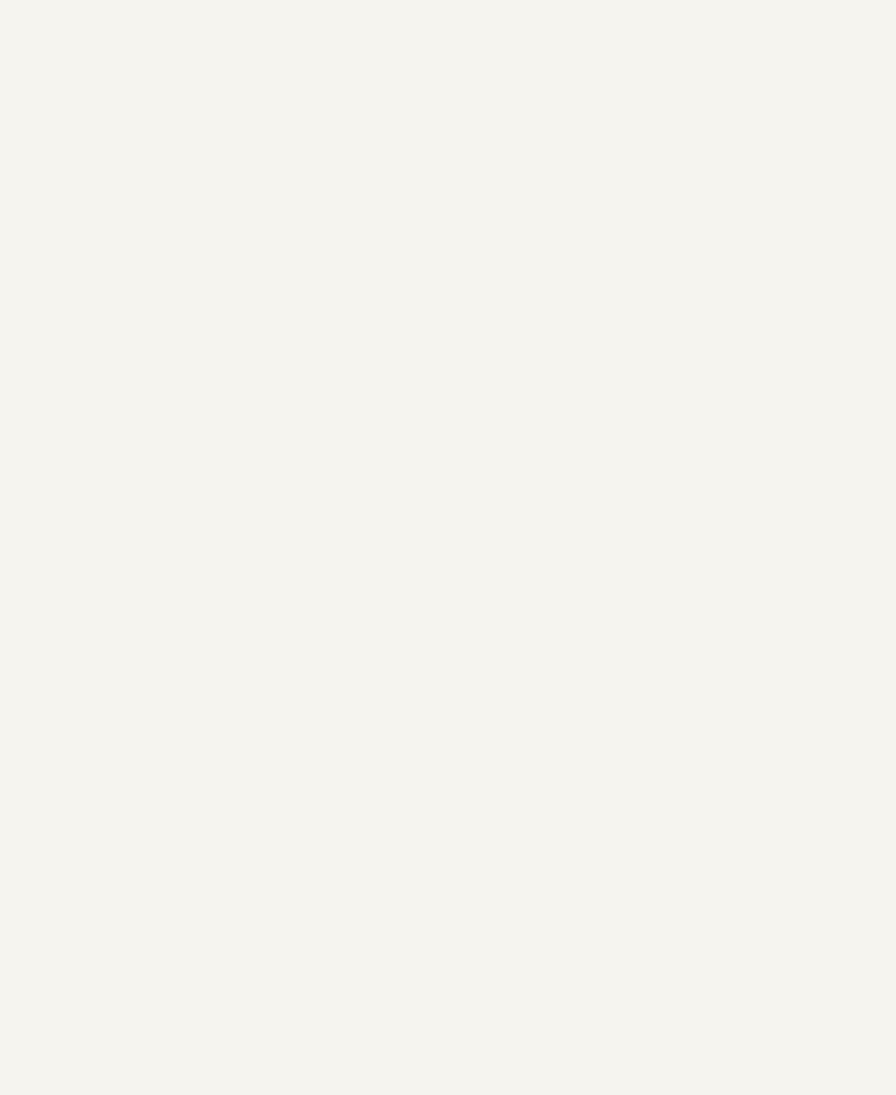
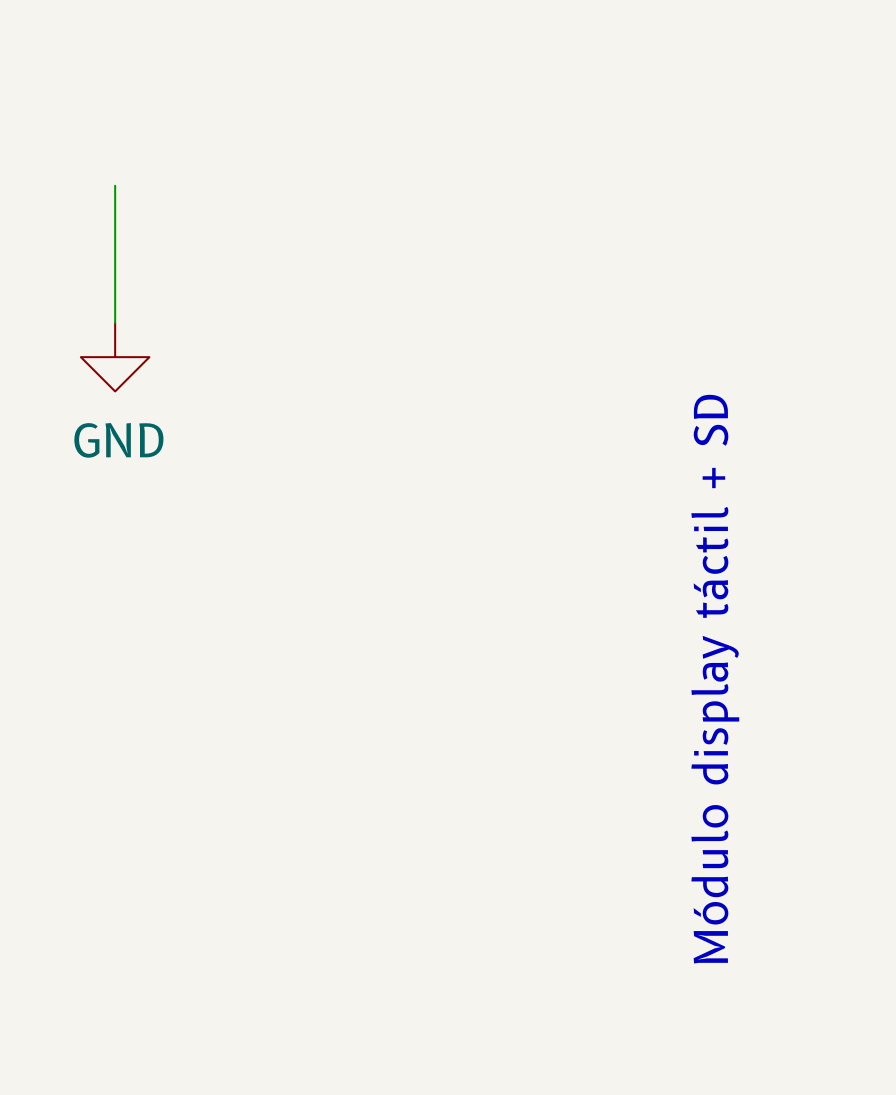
wire: none -> (115, 185) (115, 322)
power symbol: none -> GND (115, 357)
text: none -> Módulo display táctil + SD (715, 679)

